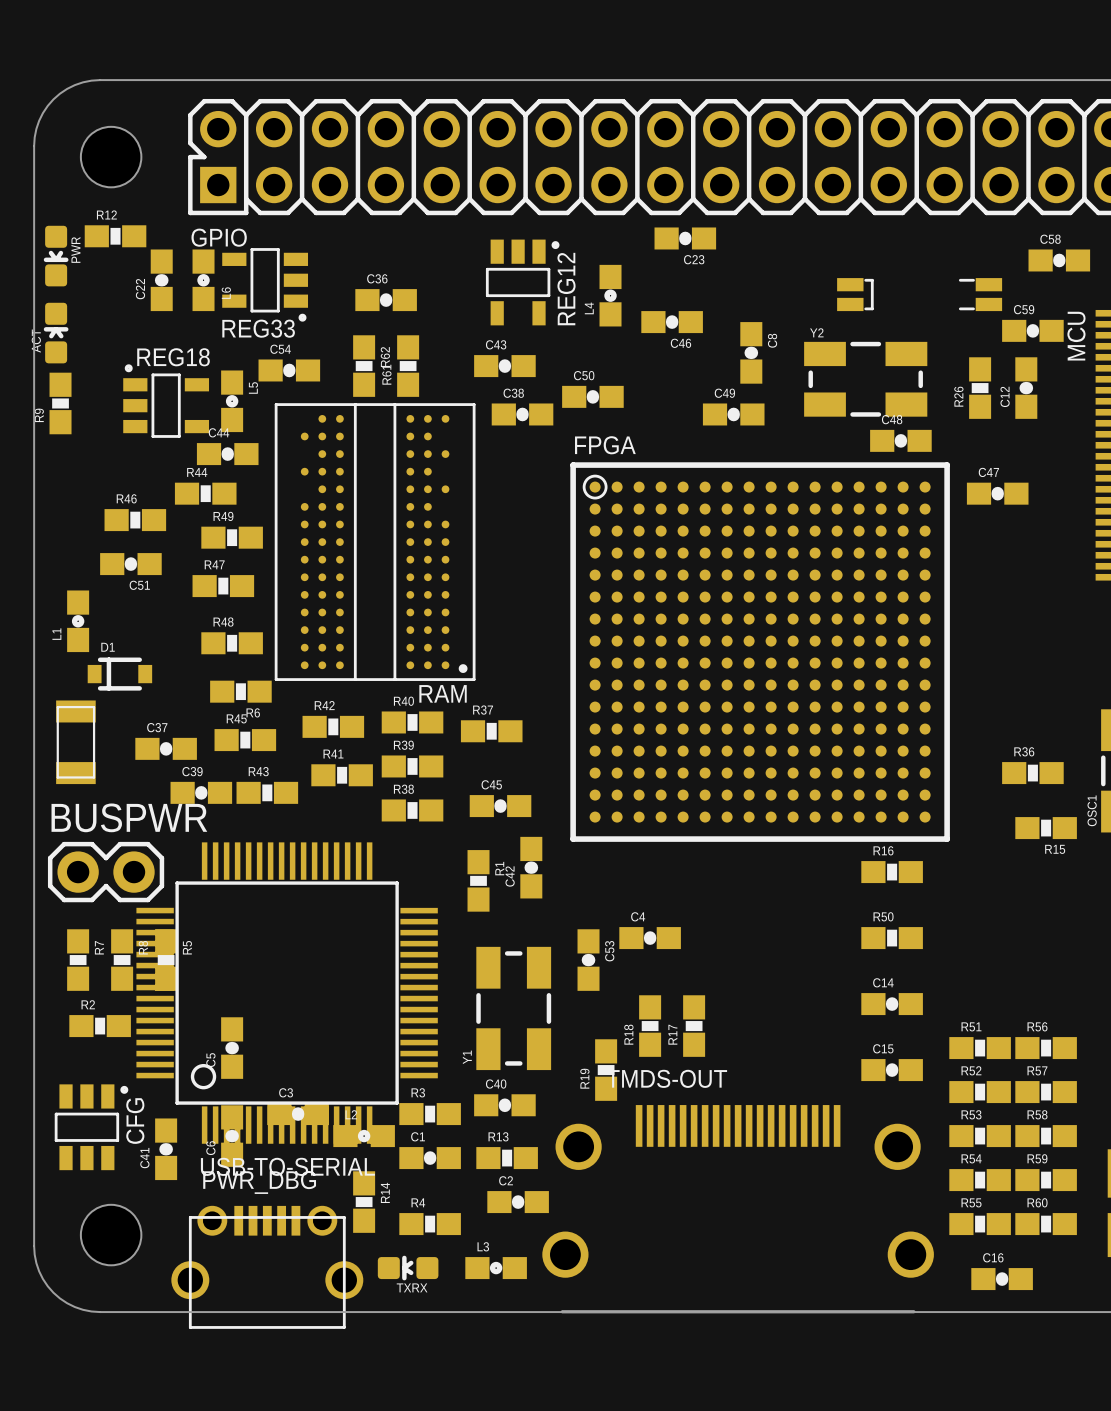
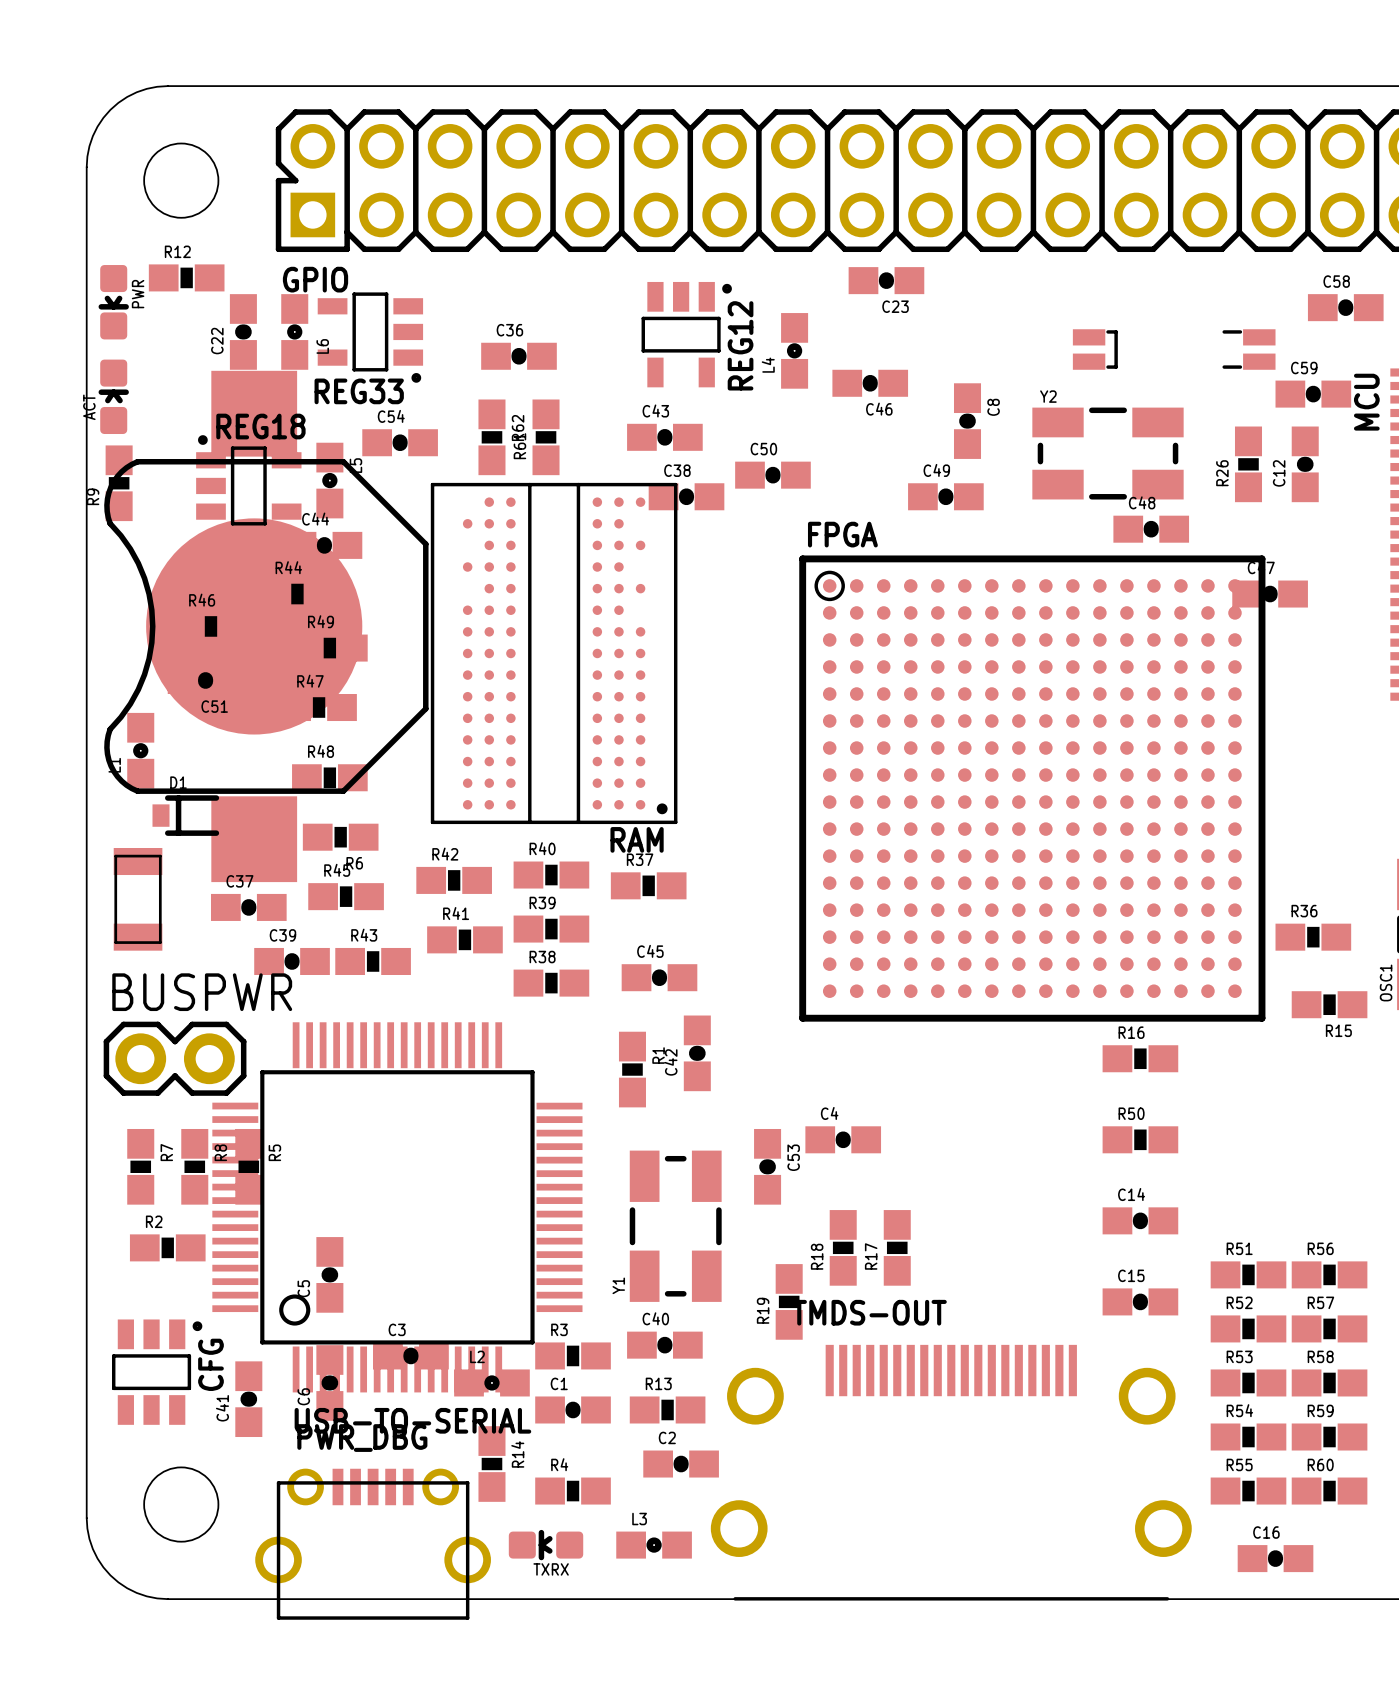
part: none -> (266, 626)
RAM position: (375, 542) -> (554, 653)
FPGA position: (760, 652) -> (1032, 788)

